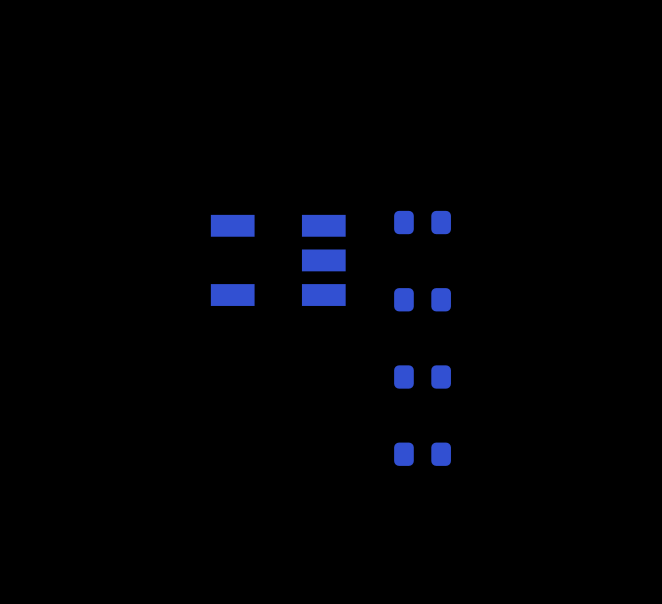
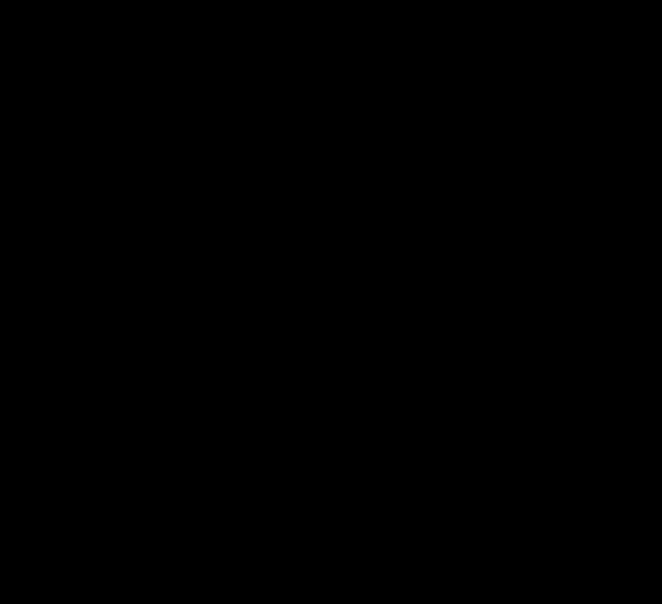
part: (422, 222) -> none
part: (278, 260) -> none
part: (422, 299) -> none
part: (422, 377) -> none
part: (422, 454) -> none

